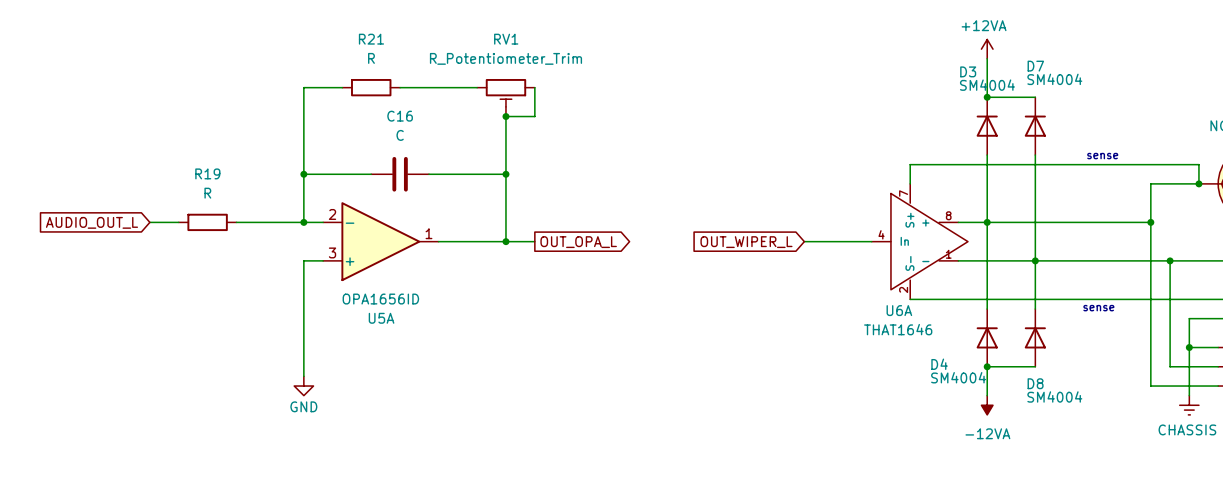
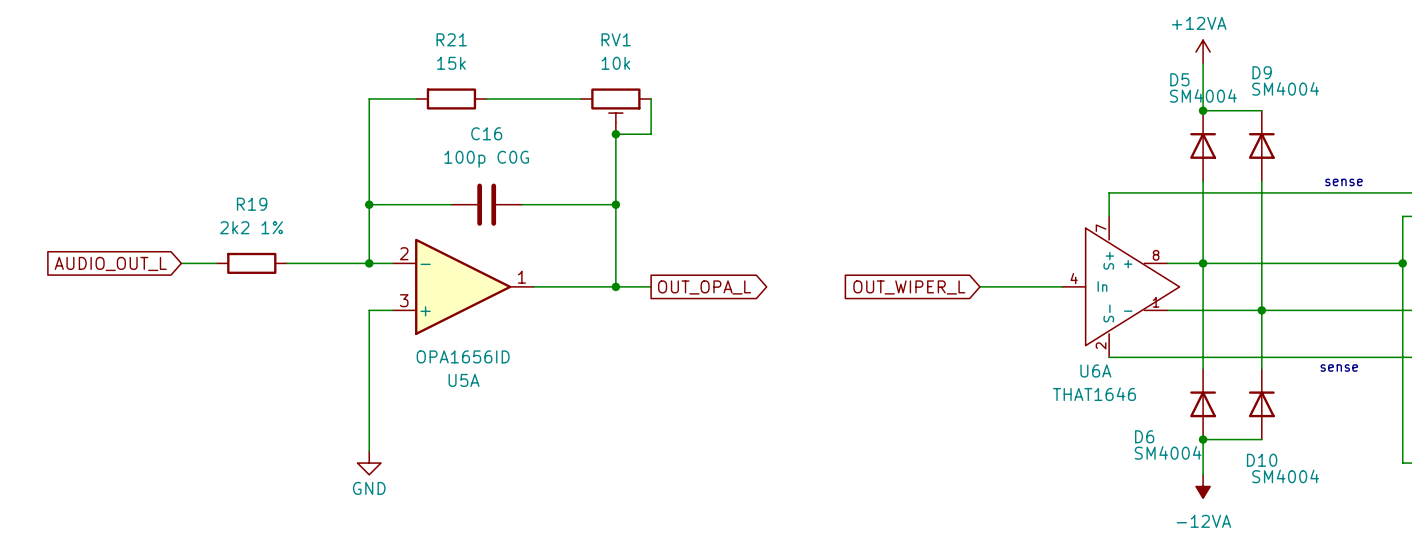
R21 value: R (371, 58) -> 15k (451, 63)
RV1 value: R_Potentiometer_Trim (505, 58) -> 10k (615, 63)
D7 name: D7 (1035, 66) -> D9 (1262, 72)
D3 name: D3 (968, 71) -> D5 (1179, 79)
C16 value: C (400, 135) -> 100p C0G (486, 159)
R19 value: R (207, 193) -> 2k2 1% (251, 227)
D4 name: D4 (939, 364) -> D6 (1144, 436)
D8 name: D8 (1035, 383) -> D10 (1262, 460)

